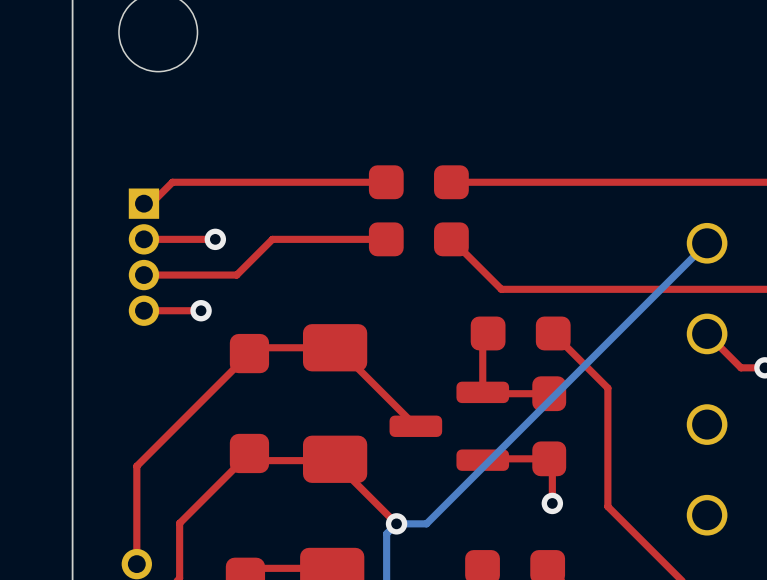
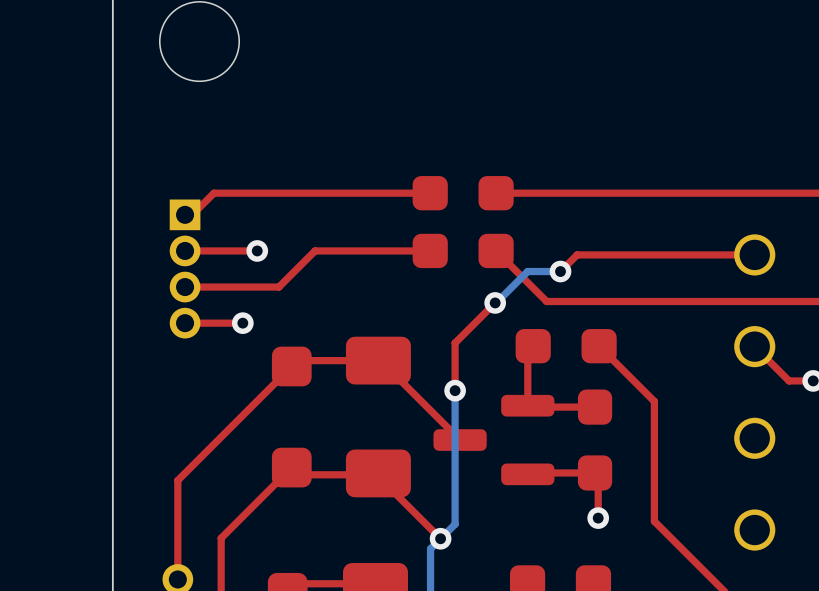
top track: none -> (754, 254) (577, 254) (560, 271)
bottom track: (707, 243) (426, 523) (396, 523) -> (455, 390) (455, 524) (440, 538)
bottom track: none -> (560, 271) (527, 271) (495, 302)
via: none -> (560, 271)
top track: none -> (495, 302) (455, 343) (455, 390)
via: none -> (495, 302)
via: none -> (455, 390)

